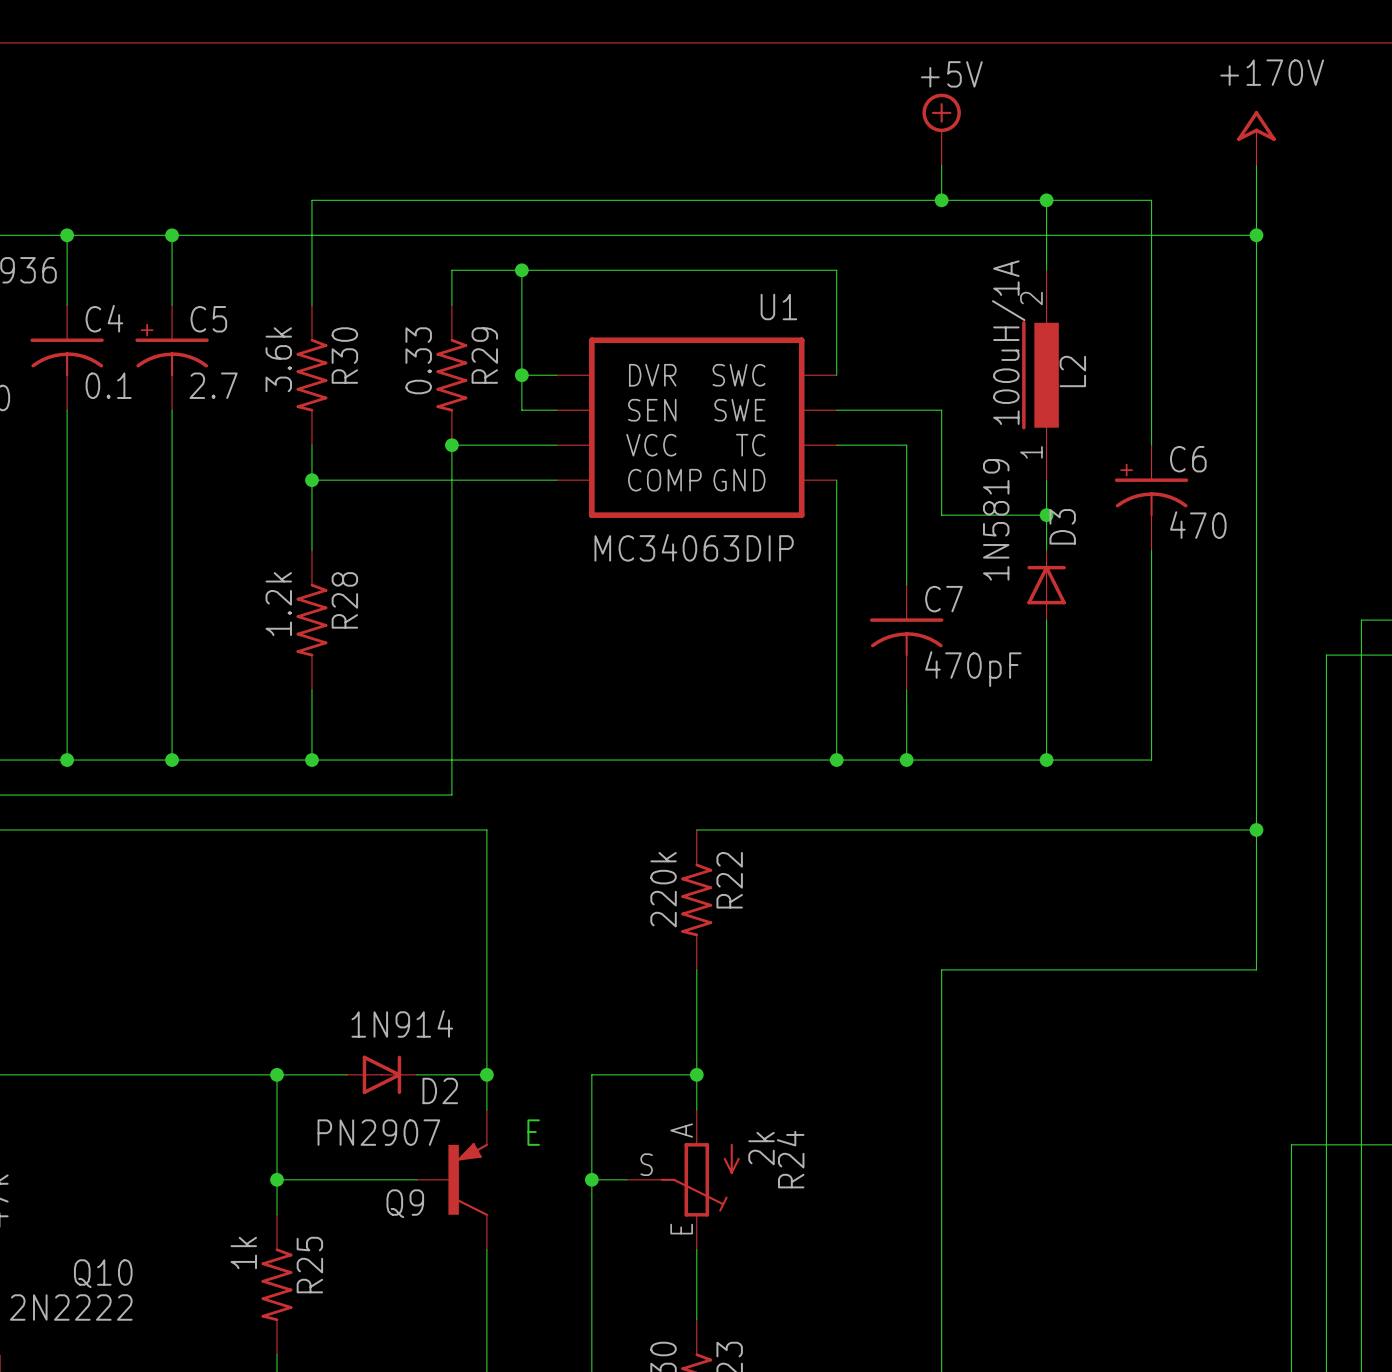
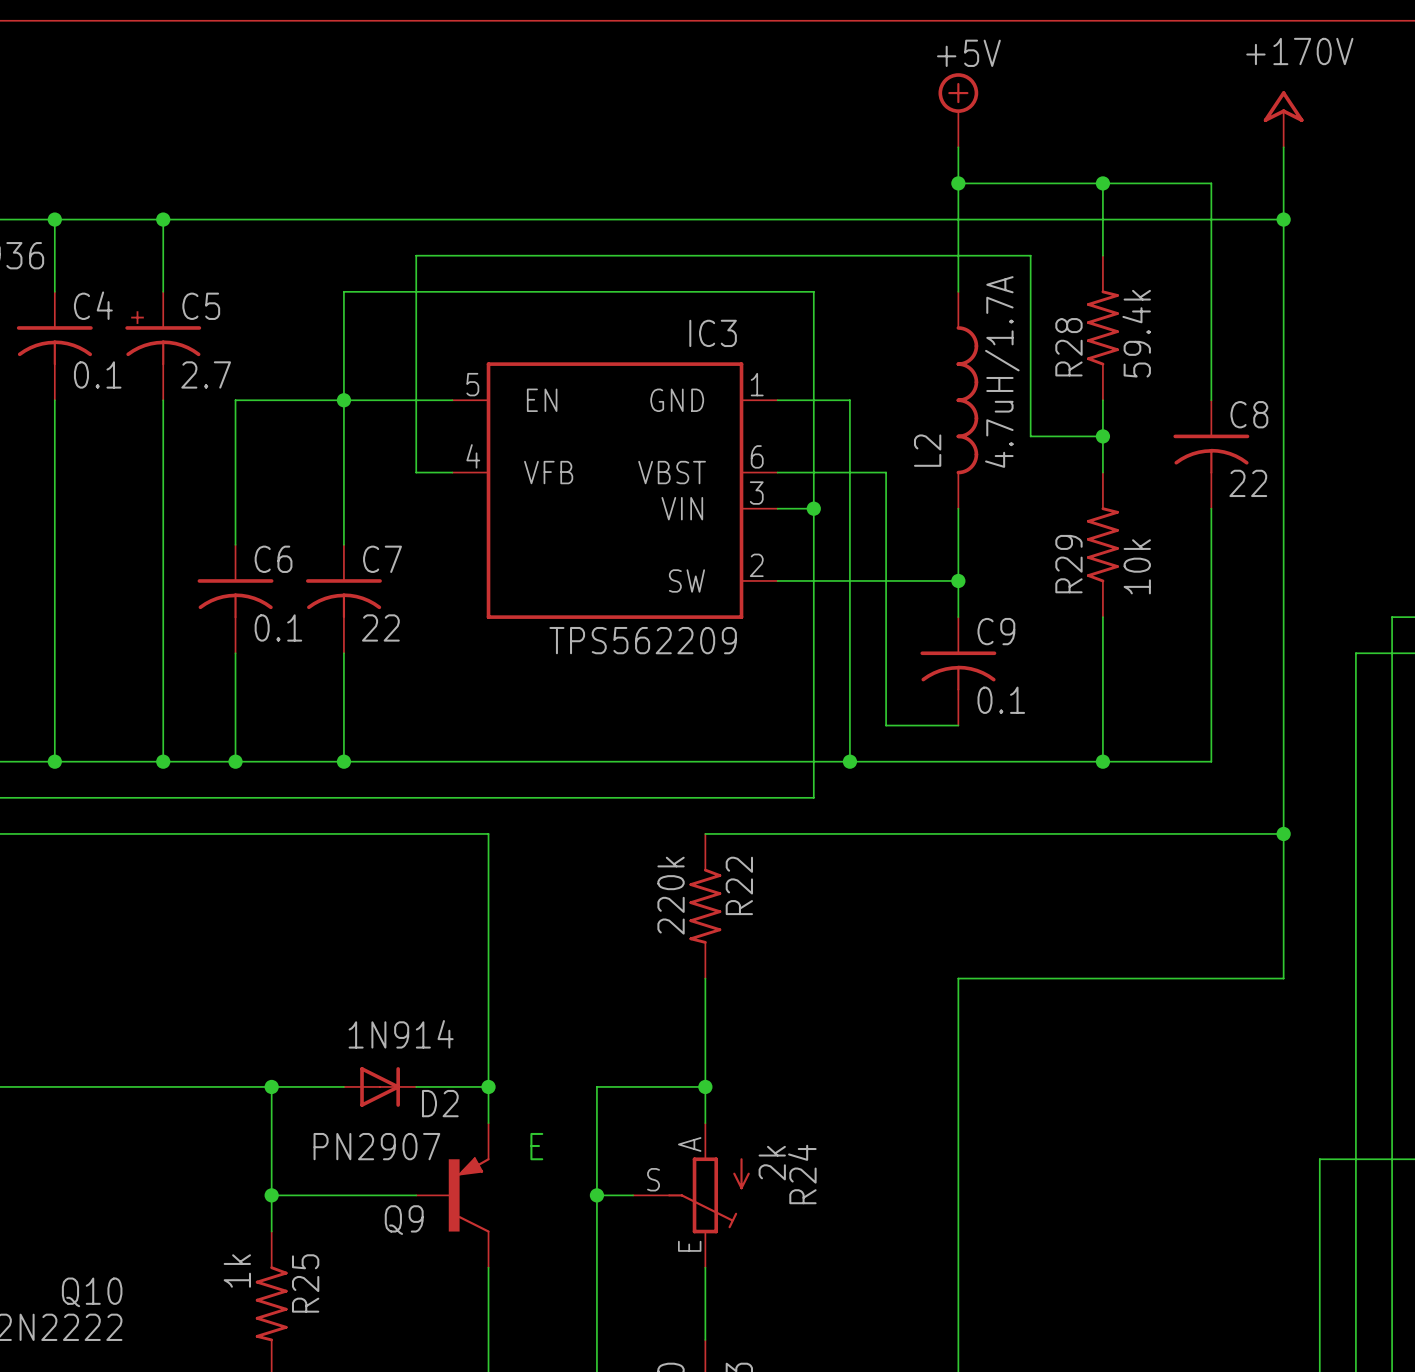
wire: (941, 200) (311, 200) (311, 305) -> (958, 183) (958, 291)
wire: (1046, 200) (1046, 270) -> (1102, 183) (1102, 255)
junction position: (1046, 200) -> (1102, 183)
wire: (1151, 200) (1151, 445) -> (1175, 183) (1211, 183) (1211, 400)
wire: (451, 270) (451, 305) -> (452, 255) (416, 255) (416, 472)
wire: (521, 270) (521, 410) (556, 410) -> none
junction: (521, 270) -> none
wire: (836, 270) (836, 375) -> (849, 255) (1030, 255) (1030, 436) (1102, 436)
L2 symbol: [1022, 270, 1059, 481] -> [956, 291, 979, 509]
L2 value: 100uH/1A (1008, 342) -> 4.7uH/1.7A (1002, 372)
R29 value: 0.33 (418, 360) -> 10k (1137, 566)
L2 name position: L2 (1072, 371) -> L2 (927, 450)
R30: 3.6k (311, 375) -> none
R29 rotation: 0° (451, 375) -> 180° (1102, 544)
R29 position: (451, 375) -> (1102, 544)
junction: (521, 375) -> none
junction: none -> (343, 400)
wire: none -> (452, 400) (235, 400) (235, 544)
wire: none -> (777, 400) (849, 400) (849, 472)
wire: (836, 410) (941, 410) (941, 515) (1046, 515) -> none
U1: MC34063DIP (696, 427) -> none
wire: (311, 445) (311, 550) -> (343, 653) (343, 761)
junction: (451, 445) -> none
wire: (556, 445) (451, 445) (451, 795) -> (343, 544) (343, 291) (813, 291) (813, 797) (452, 797)
wire: (836, 445) (906, 445) (906, 585) -> none
junction: none -> (1102, 436)
C6 symbol: [1114, 445, 1189, 551] -> [197, 544, 274, 654]
C8: none -> 22 (1211, 454)
wire: (311, 480) (416, 480) -> none
junction: (311, 480) -> none
wire: (451, 480) (556, 480) -> none
wire: none -> (777, 472) (886, 472) (886, 725) (958, 725)
wire: (1046, 480) (1046, 550) -> (1102, 400) (1102, 472)
IC3: none -> TPS562209 (615, 490)
junction: none -> (813, 508)
wire: none -> (958, 508) (958, 617)
junction: (1046, 515) -> none
C6 value: 470 (1198, 525) -> 0.1 (278, 627)
wire: (1151, 550) (1151, 760) -> (1211, 508) (1211, 761) (1175, 761)
wire: none -> (777, 580) (958, 580)
junction: none -> (958, 580)
D3: 1N5819 (1046, 585) -> none
R28 value: 1.2k (278, 604) -> 59.4k (1136, 333)
R28 rotation: 0° (311, 620) -> 180° (1102, 327)
R28 position: (311, 620) -> (1102, 327)
wire: (1046, 620) (1046, 760) -> (1102, 617) (1102, 761)
C7 position: (906, 637) -> (343, 599)
wire: none -> (235, 653) (235, 761)
C7 value: 470pF (973, 669) -> 22 (380, 627)
C9: none -> 0.1 (958, 671)
wire: (311, 690) (311, 760) -> none
wire: (906, 690) (906, 760) -> none
junction: none -> (235, 761)
junction: (311, 760) -> none
junction: none -> (343, 761)
junction: (906, 760) -> none
junction position: (1046, 760) -> (1102, 761)

